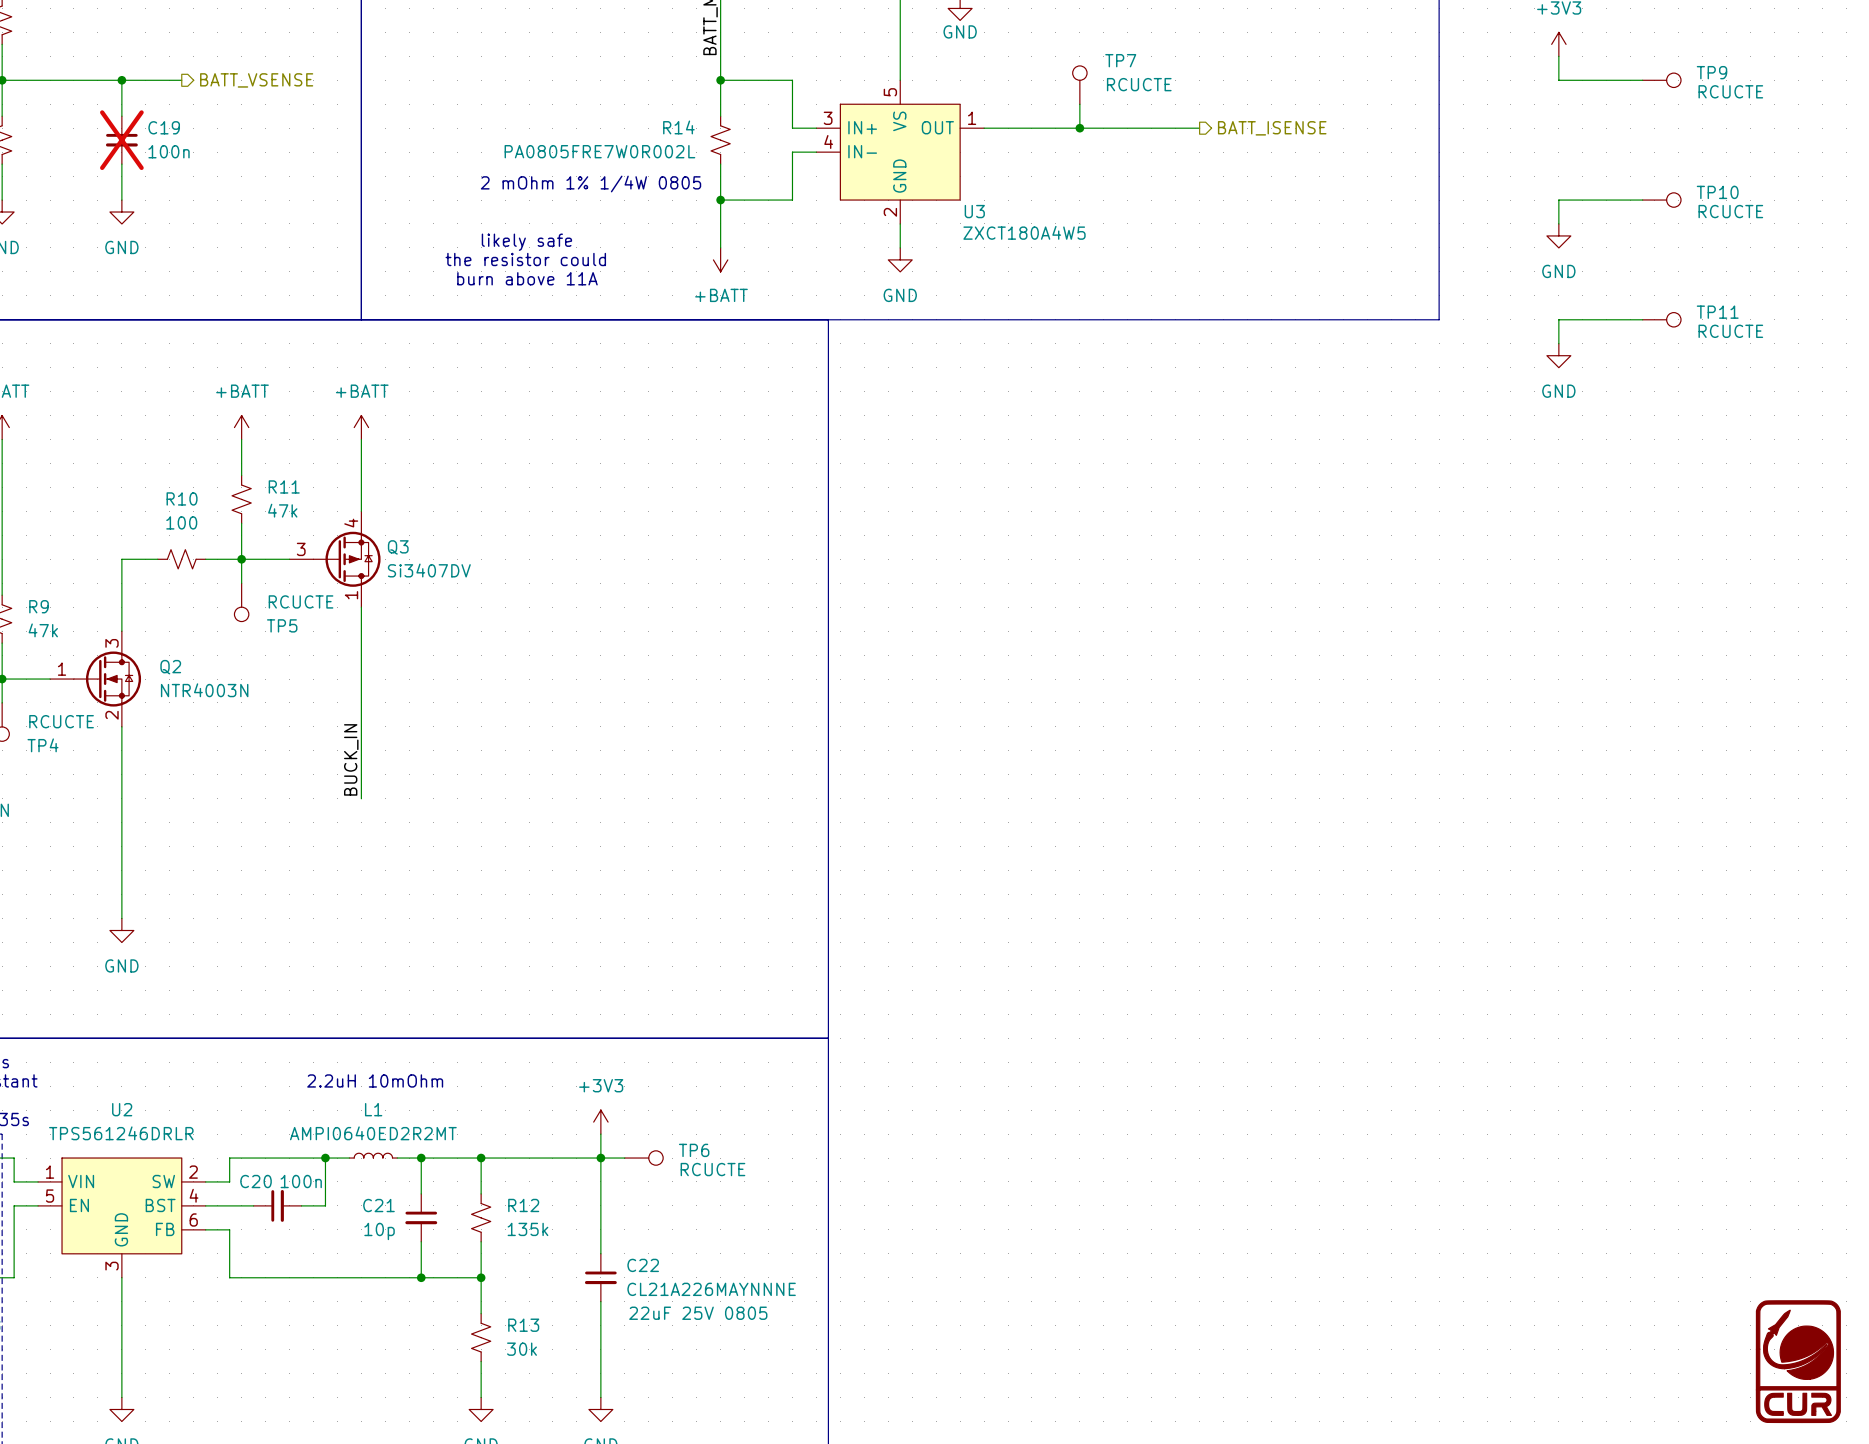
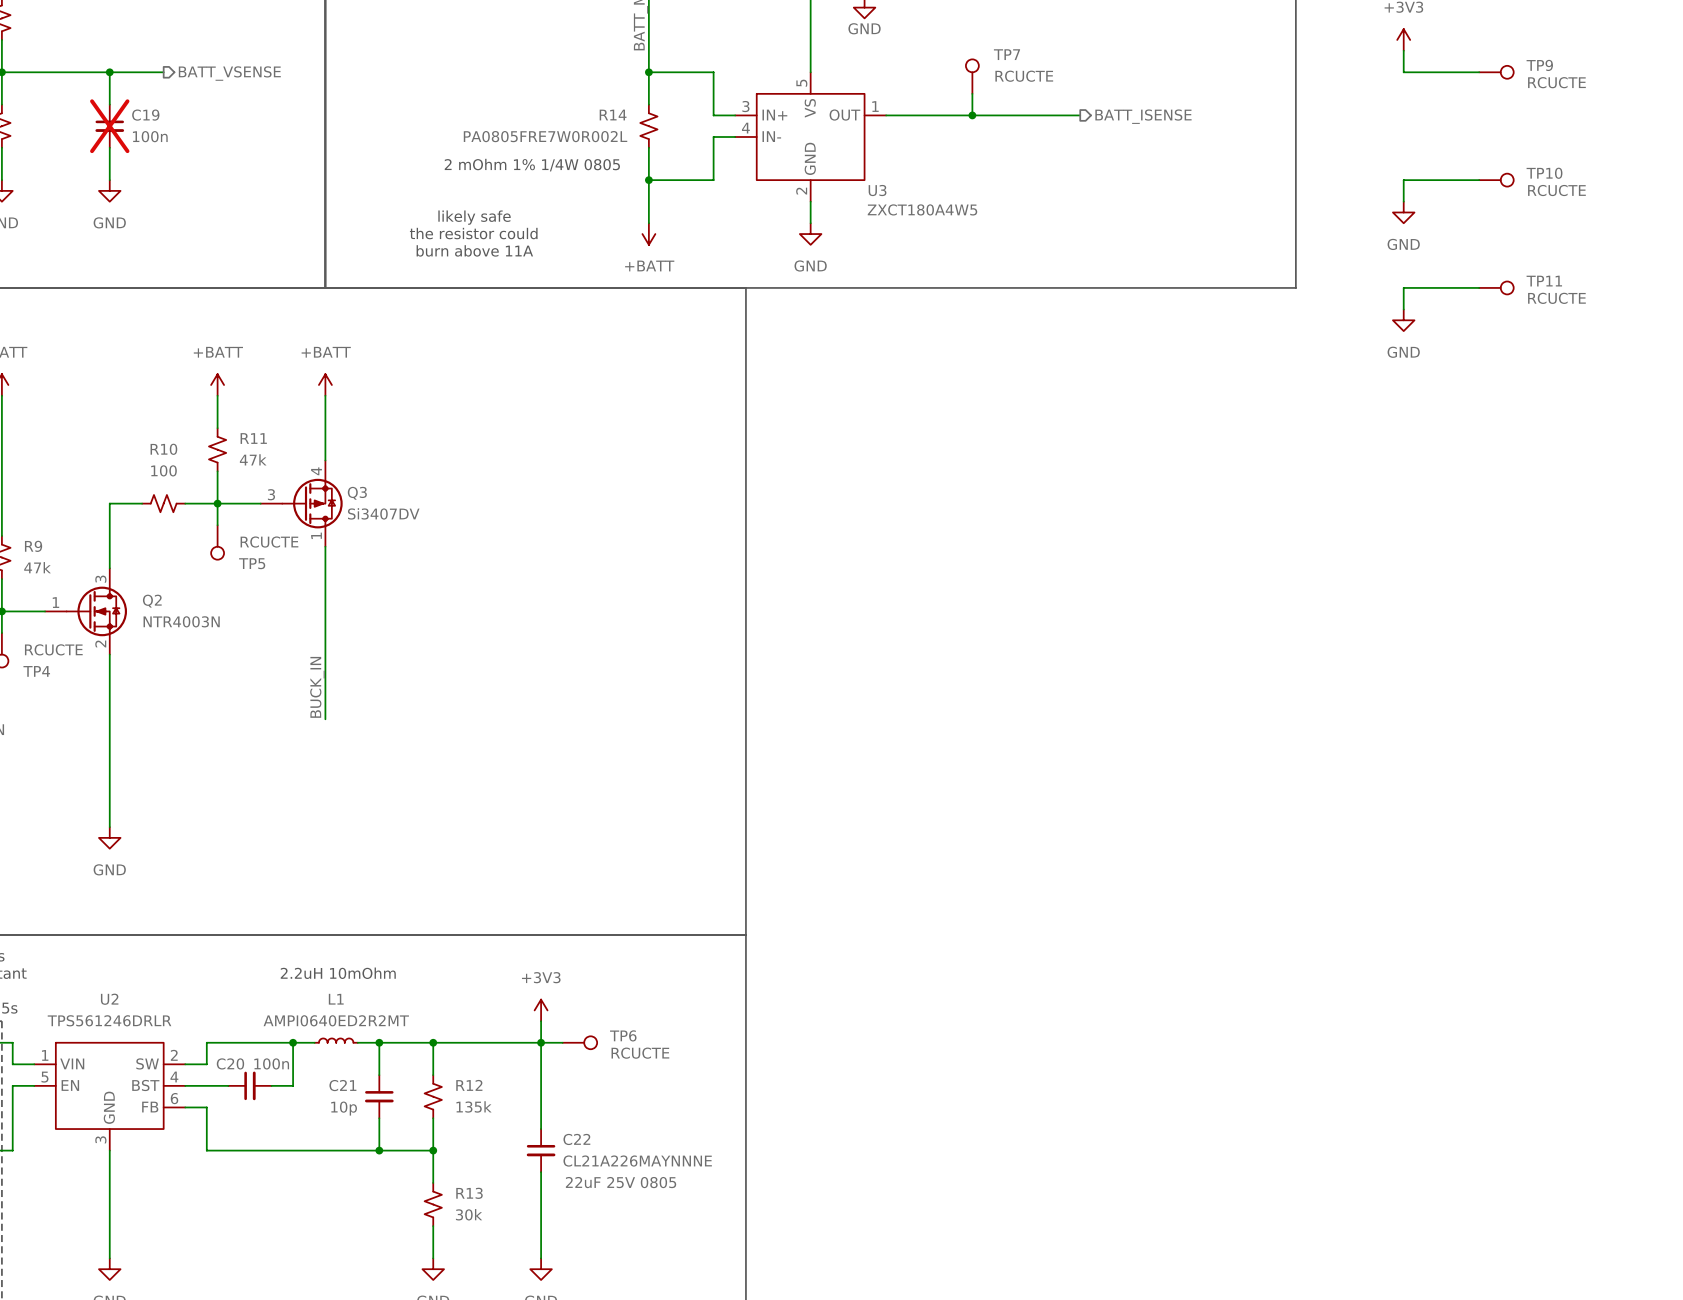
power symbol: (1798, 1361) -> none

